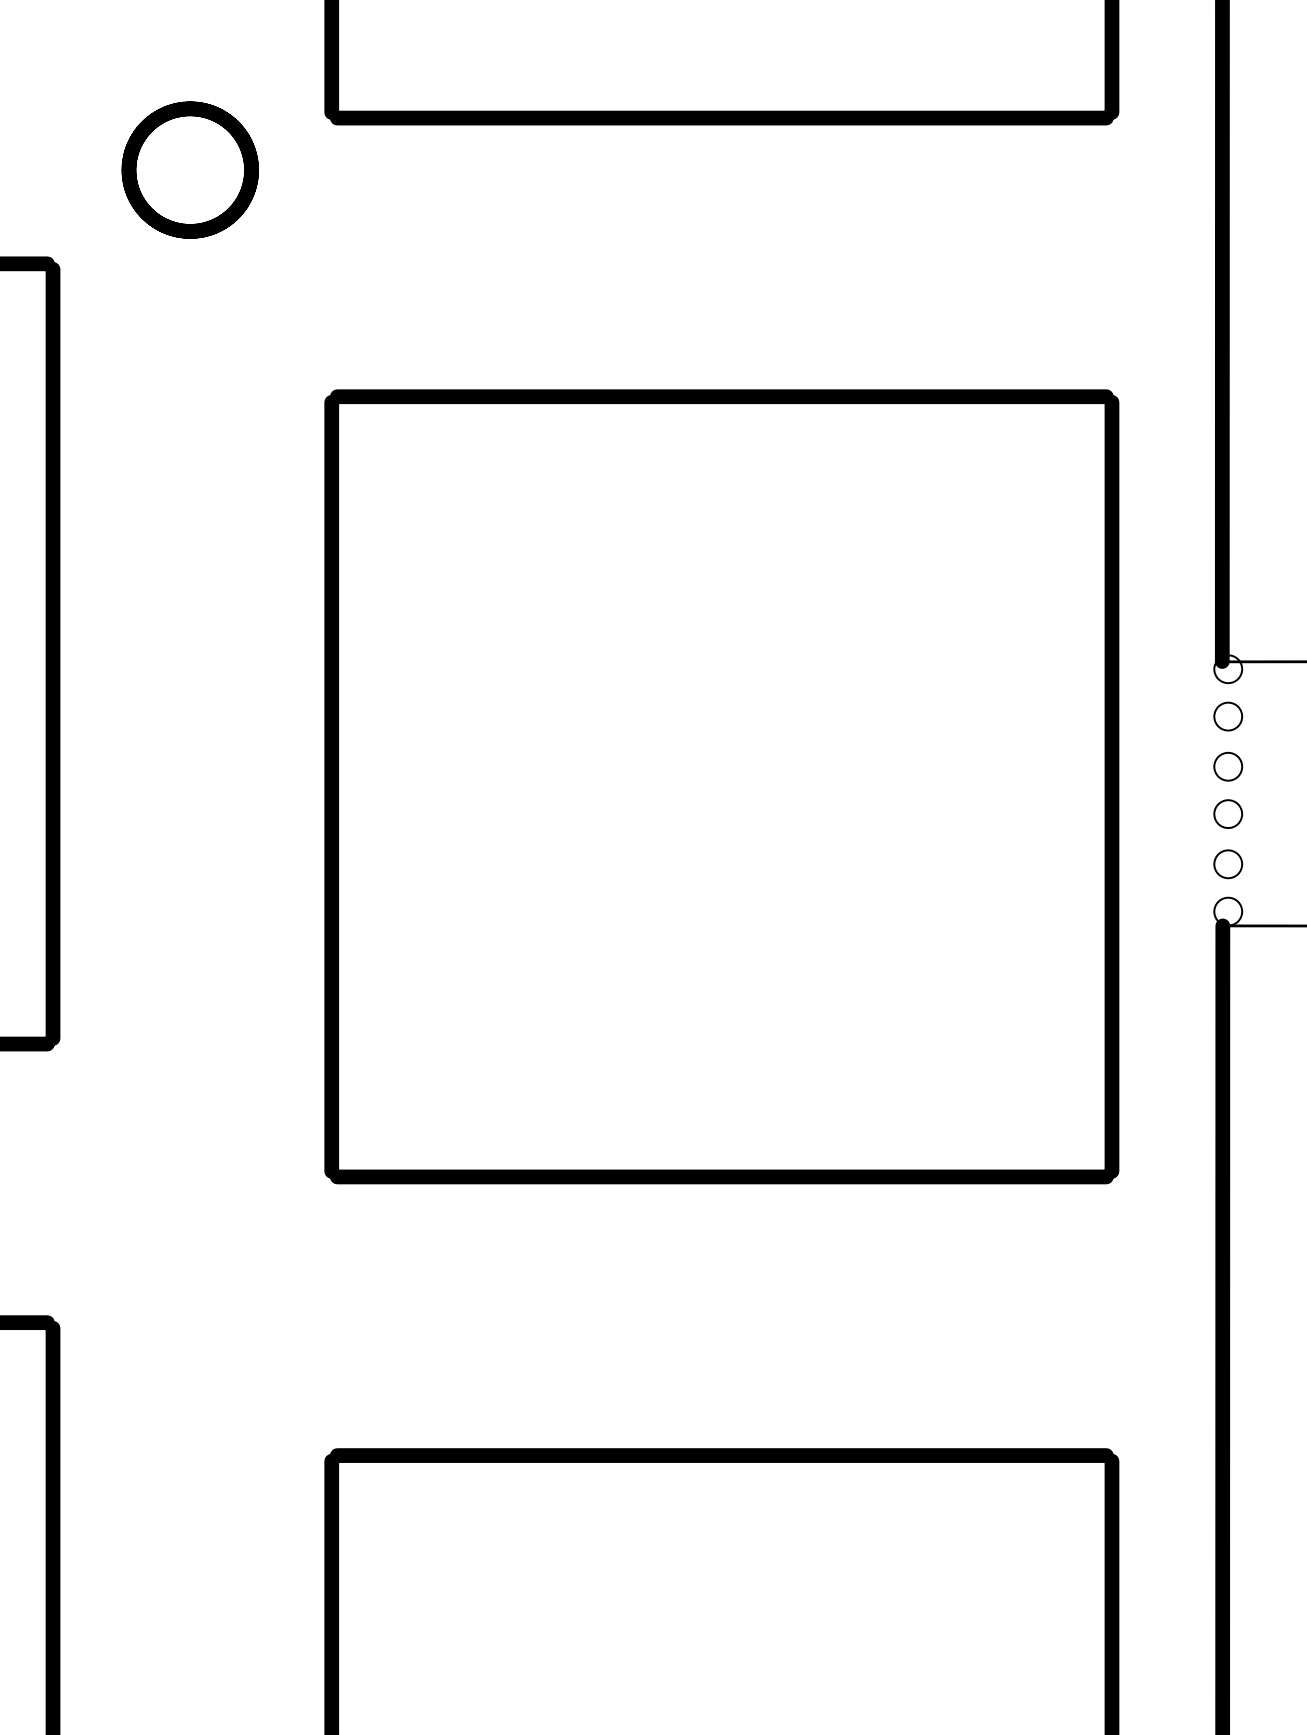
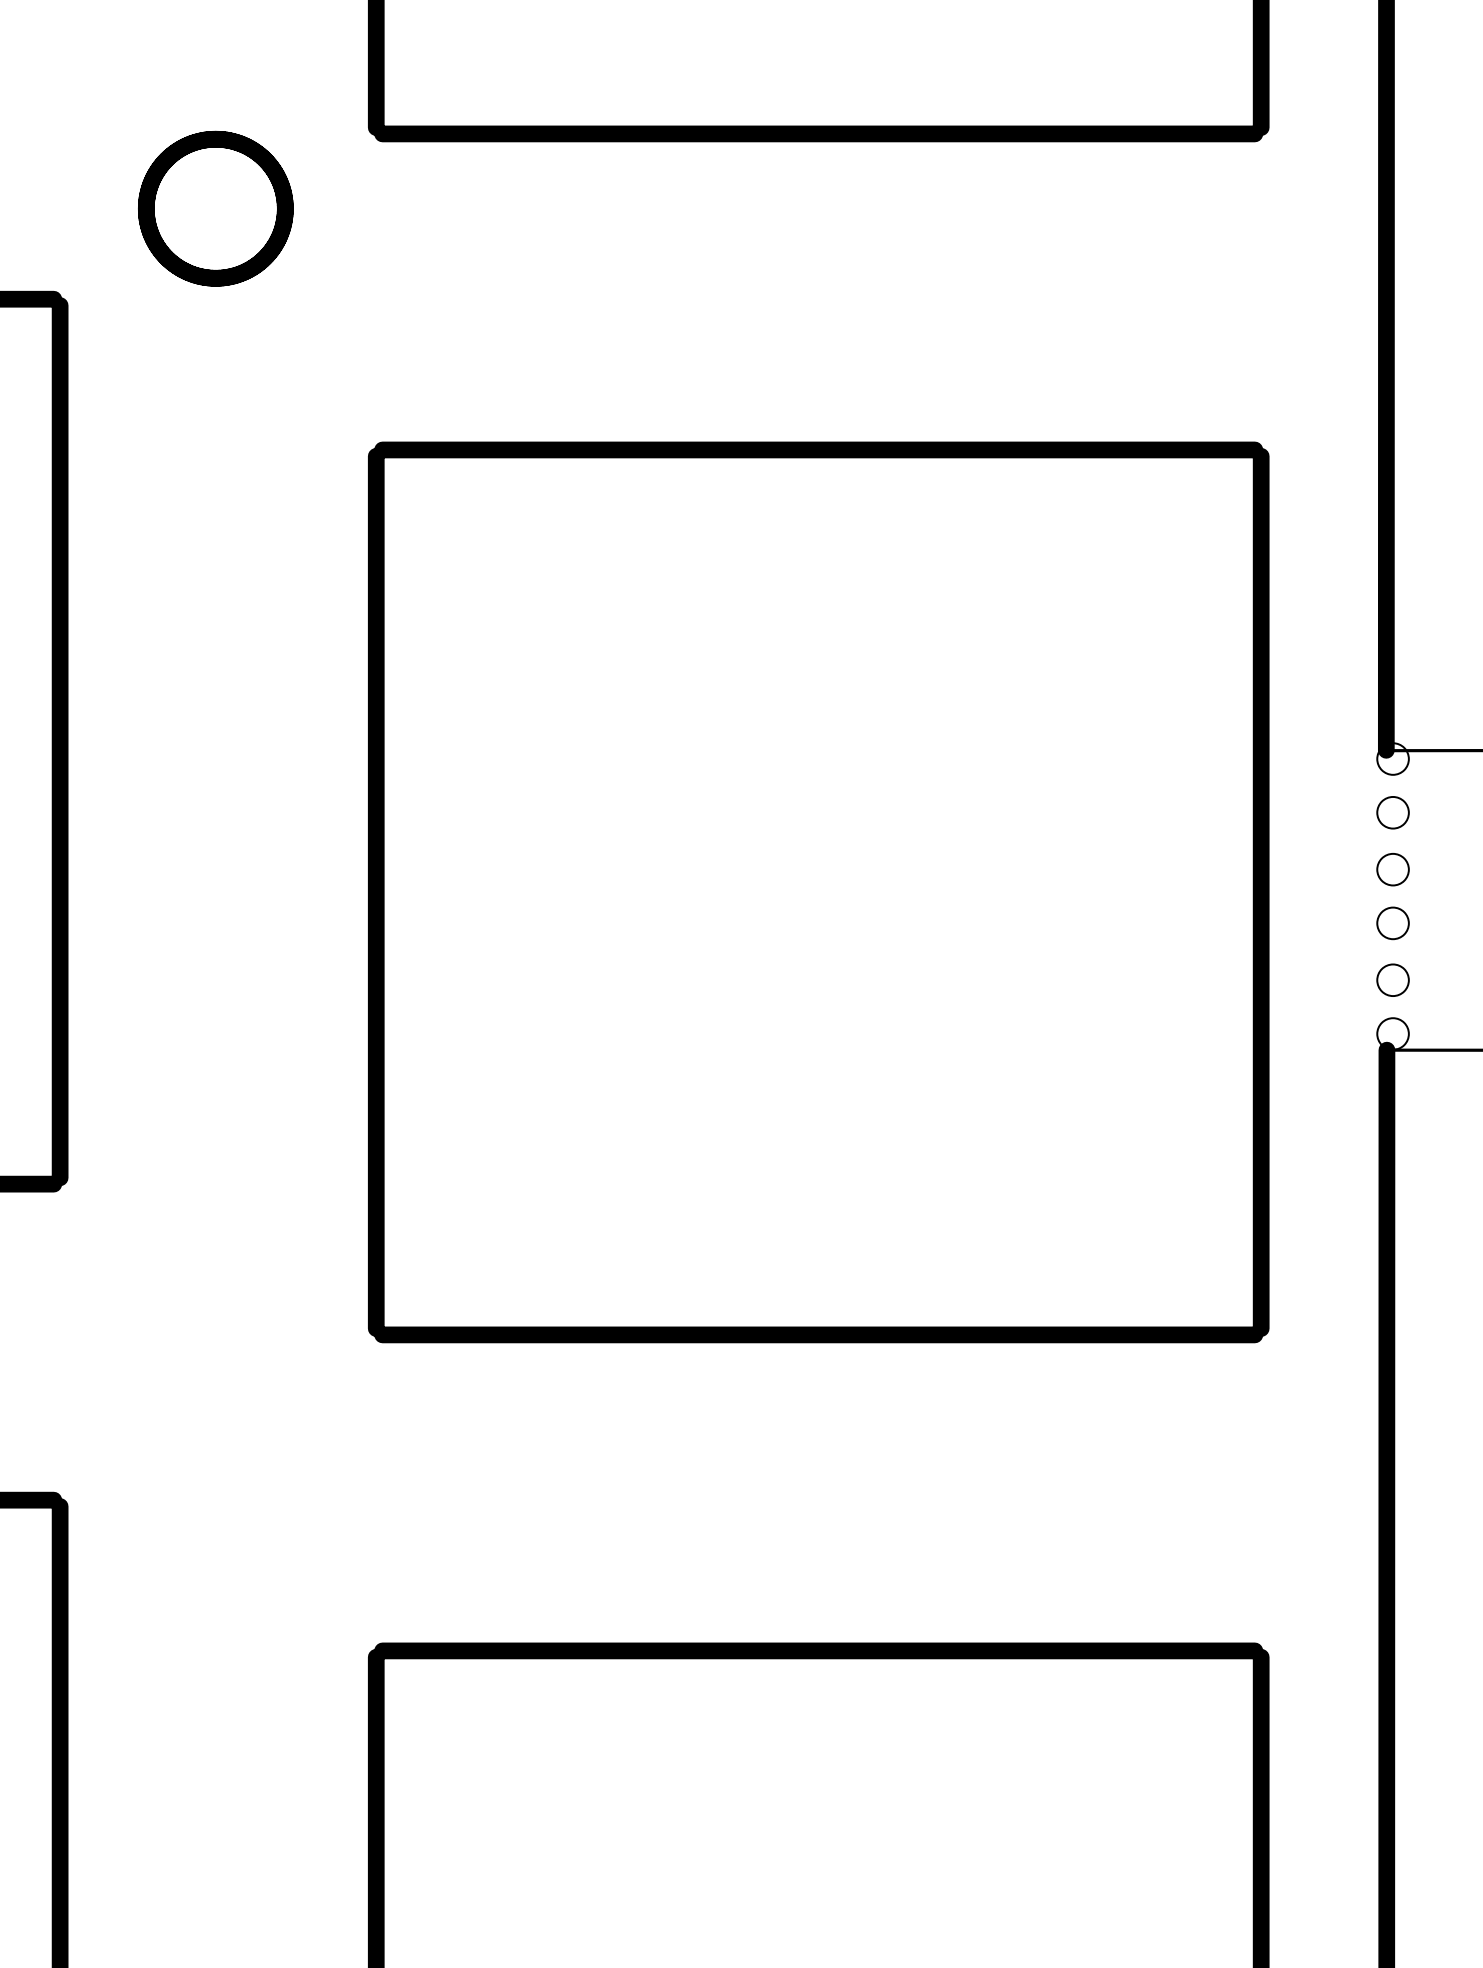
board edge: (184, 109) (161, 116) (142, 131) (131, 151) (129, 176) (136, 199) (151, 217) (172, 228) (196, 231) (219, 224) (237, 209) (248, 188) (251, 163) (244, 140) (229, 122) (208, 111) (184, 109) -> (208, 139) (182, 147) (162, 164) (149, 188) (146, 215) (154, 241) (171, 262) (195, 275) (222, 277) (248, 269) (269, 253) (282, 229) (284, 201) (276, 175) (260, 155) (236, 142) (208, 139)

